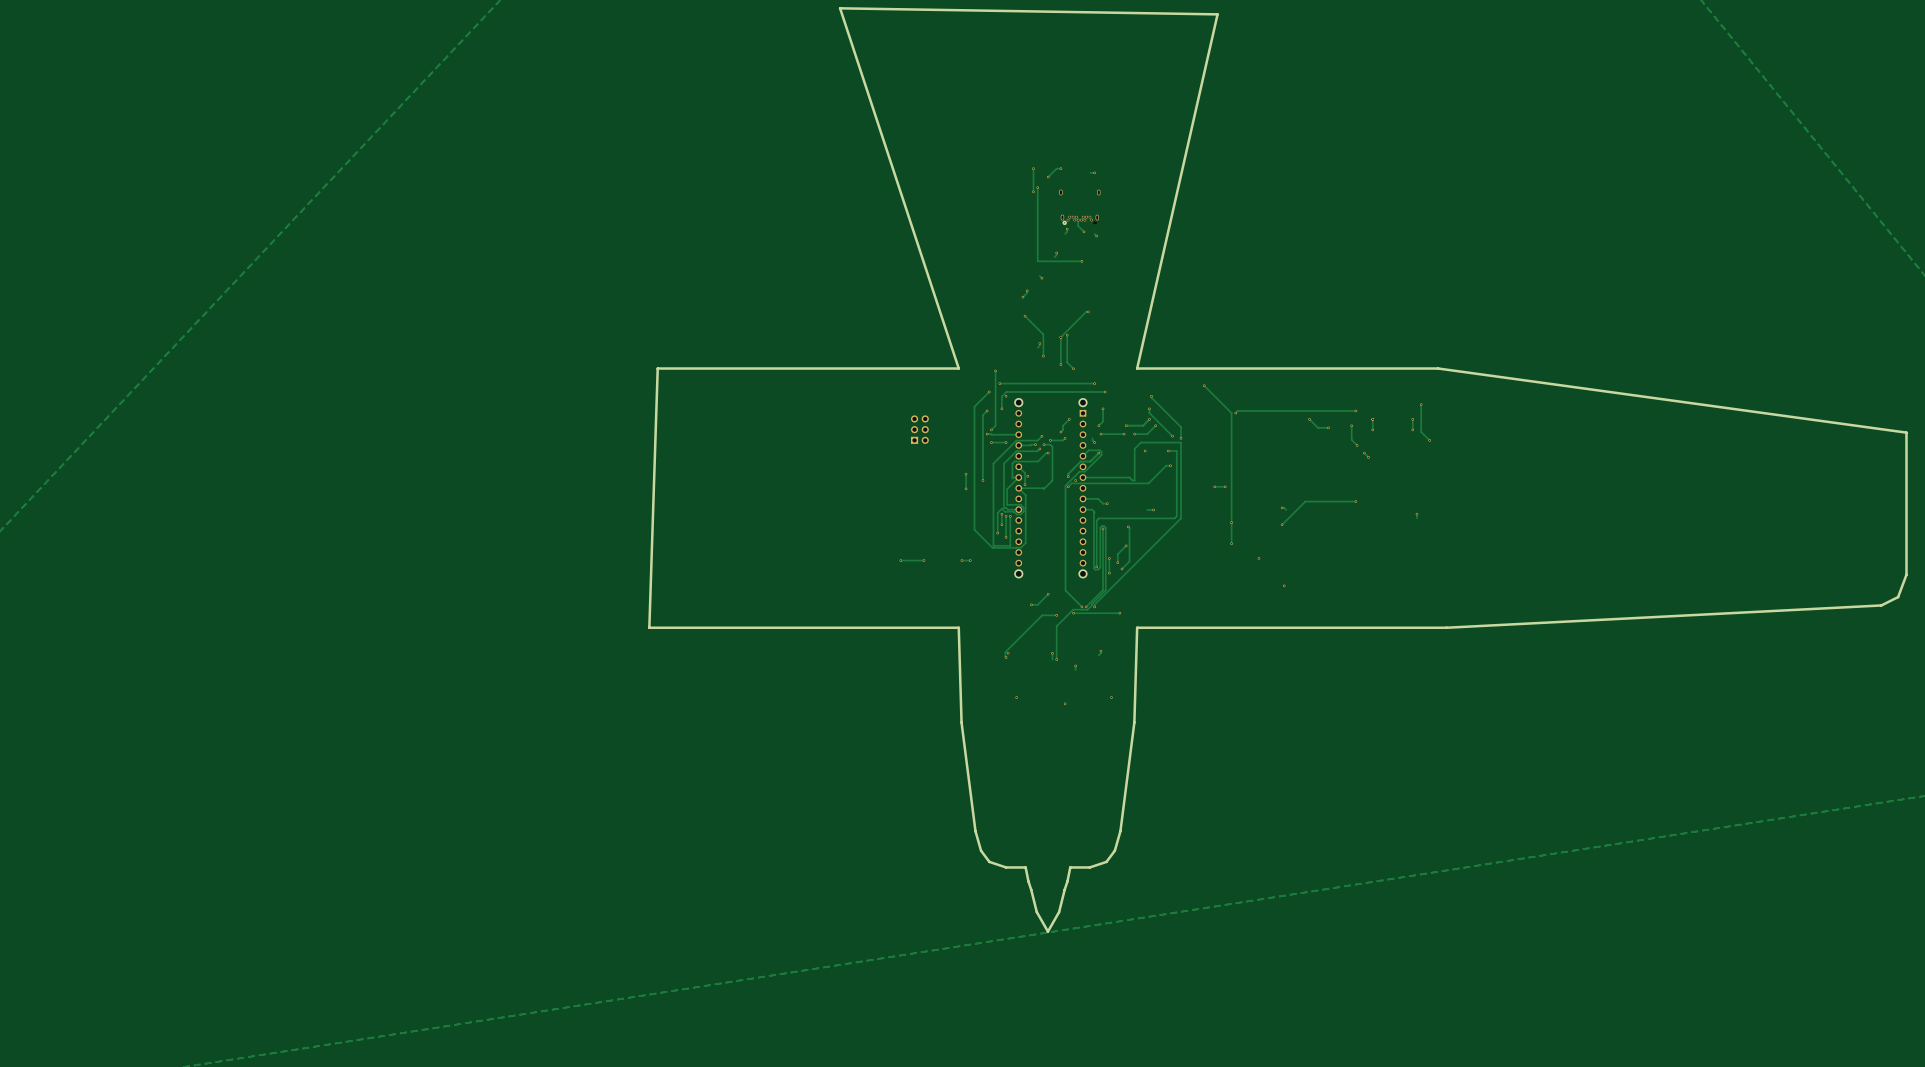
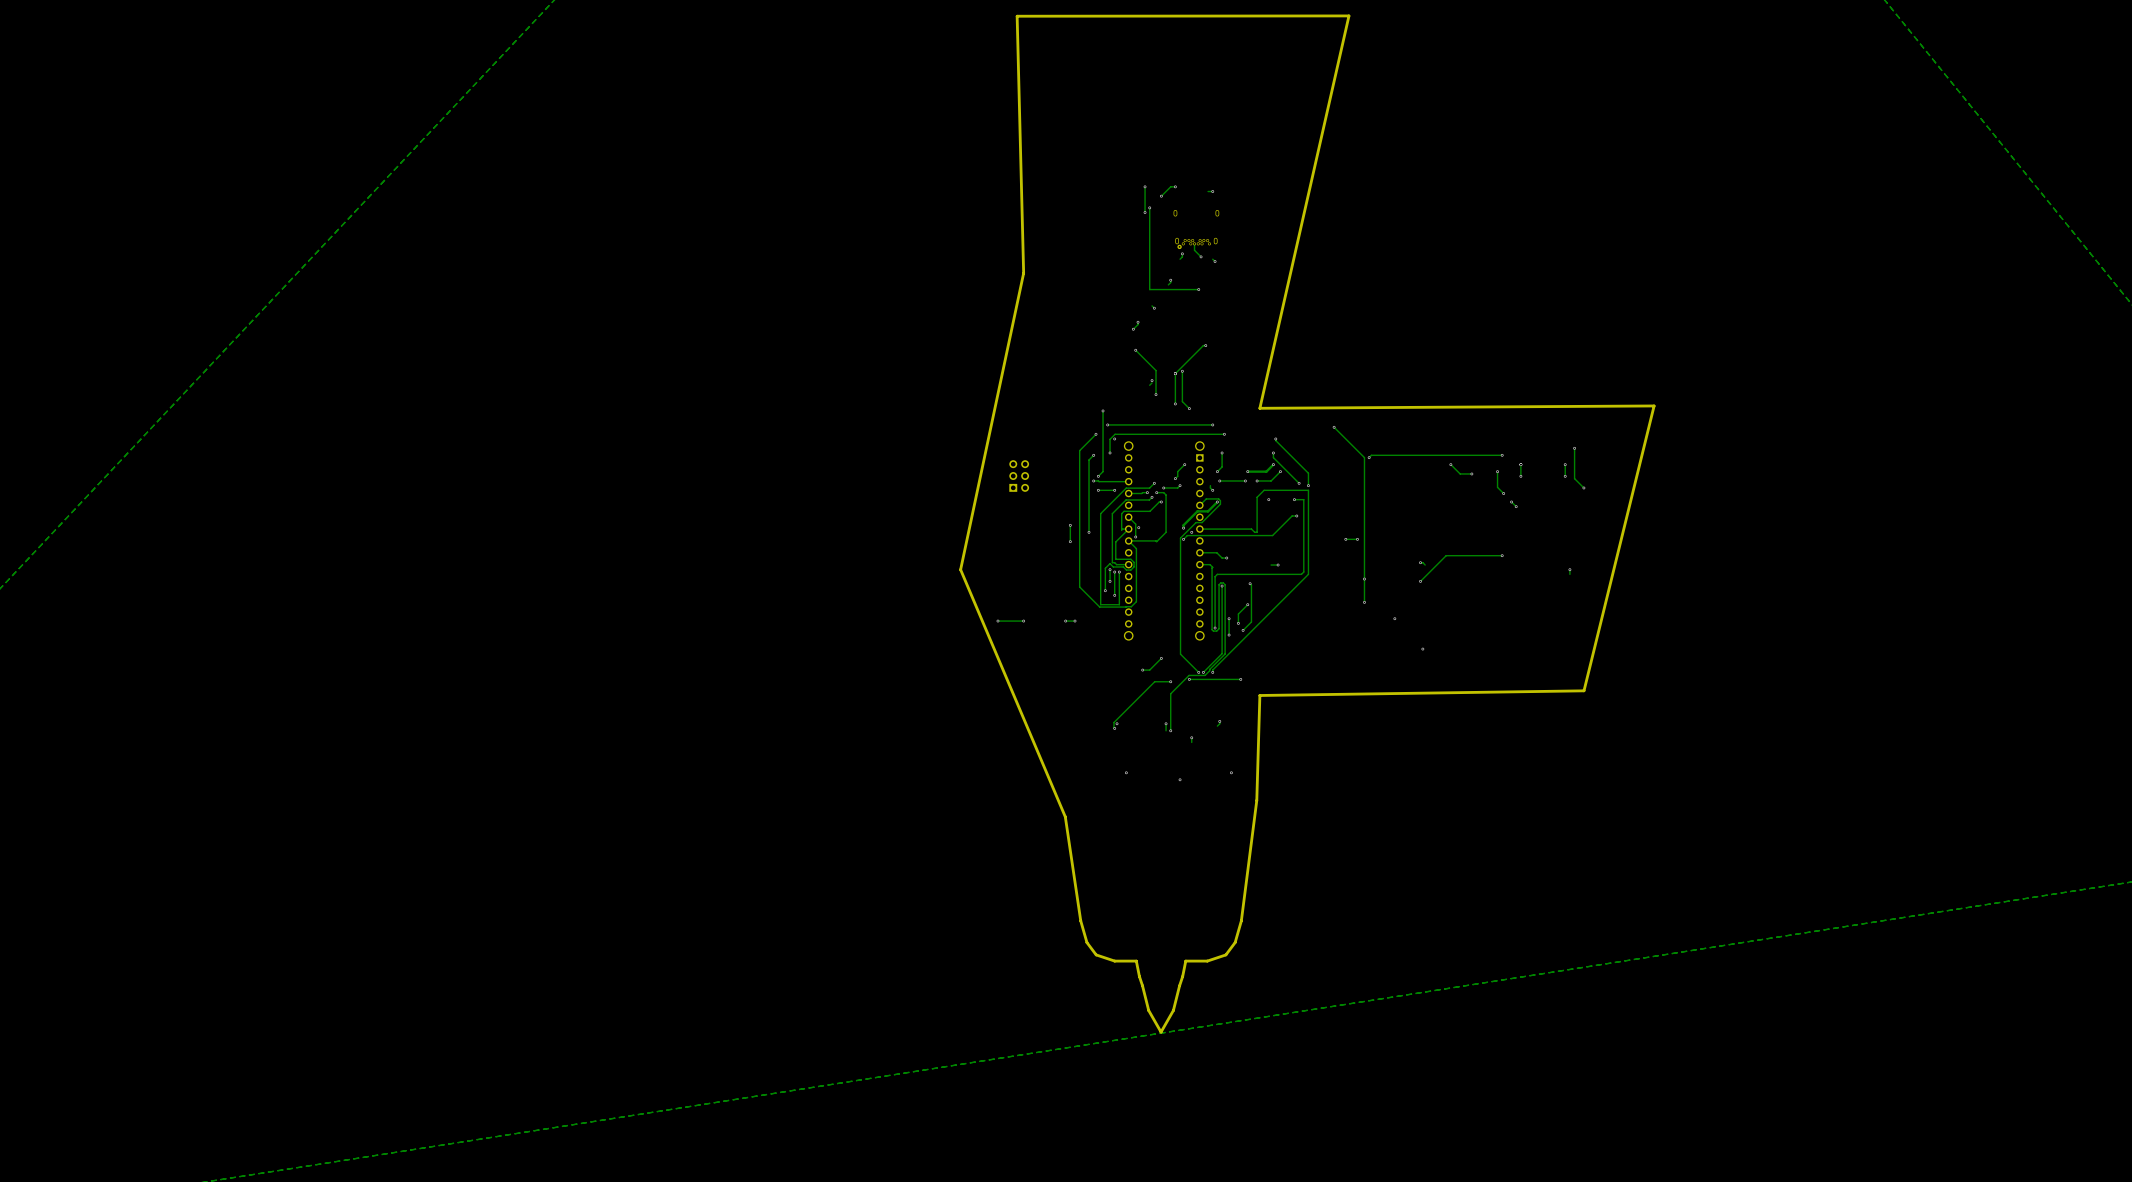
board edge: (1217, 14) (840, 8) (958, 368) (657, 368) (649, 627) (958, 627) (961, 722) (975, 831) -> (1348, 15) (1017, 16) (1023, 273) (960, 569) (1065, 816) (1080, 920)
board edge: (1137, 368) (1438, 368) (1906, 432) (1906, 574) (1898, 597) (1881, 605) (1446, 627) (1137, 627) -> (1259, 408) (1654, 405) (1584, 690) (1259, 695)

